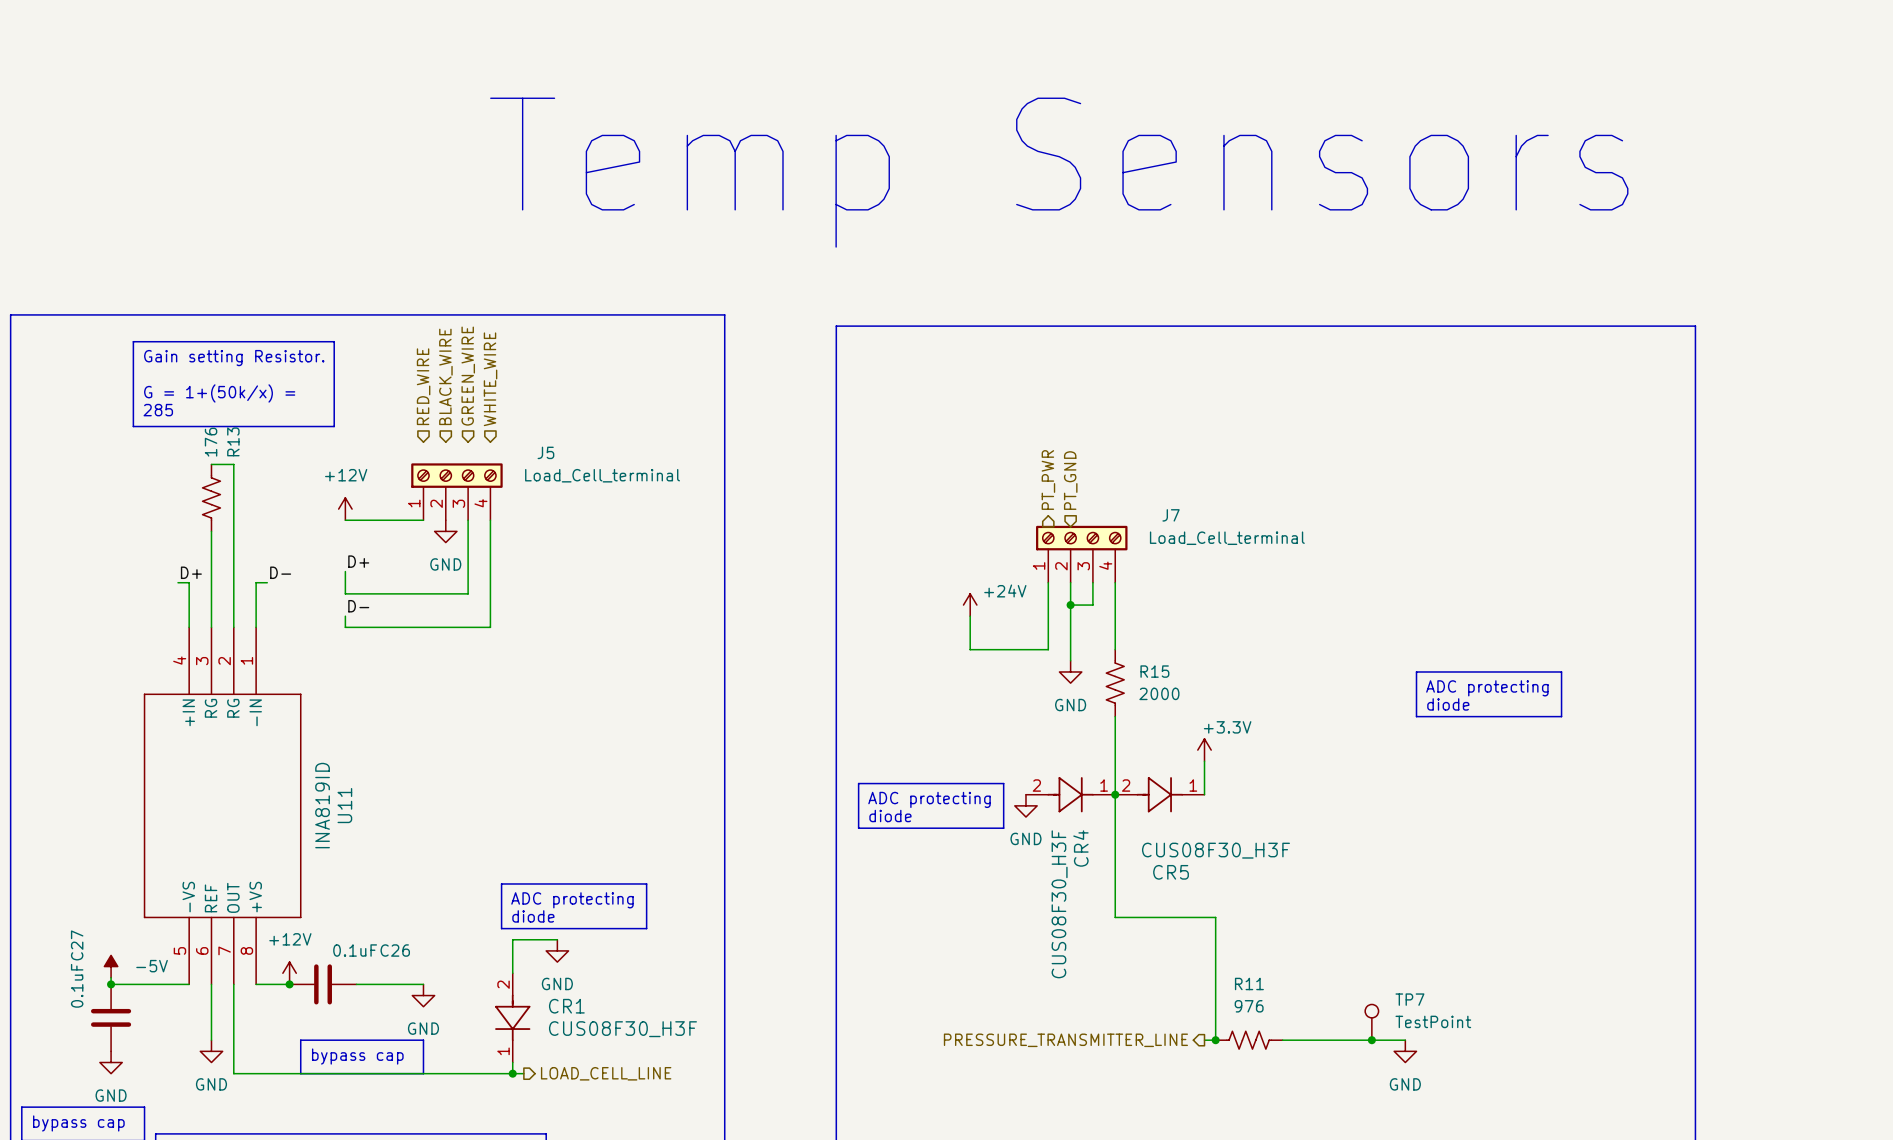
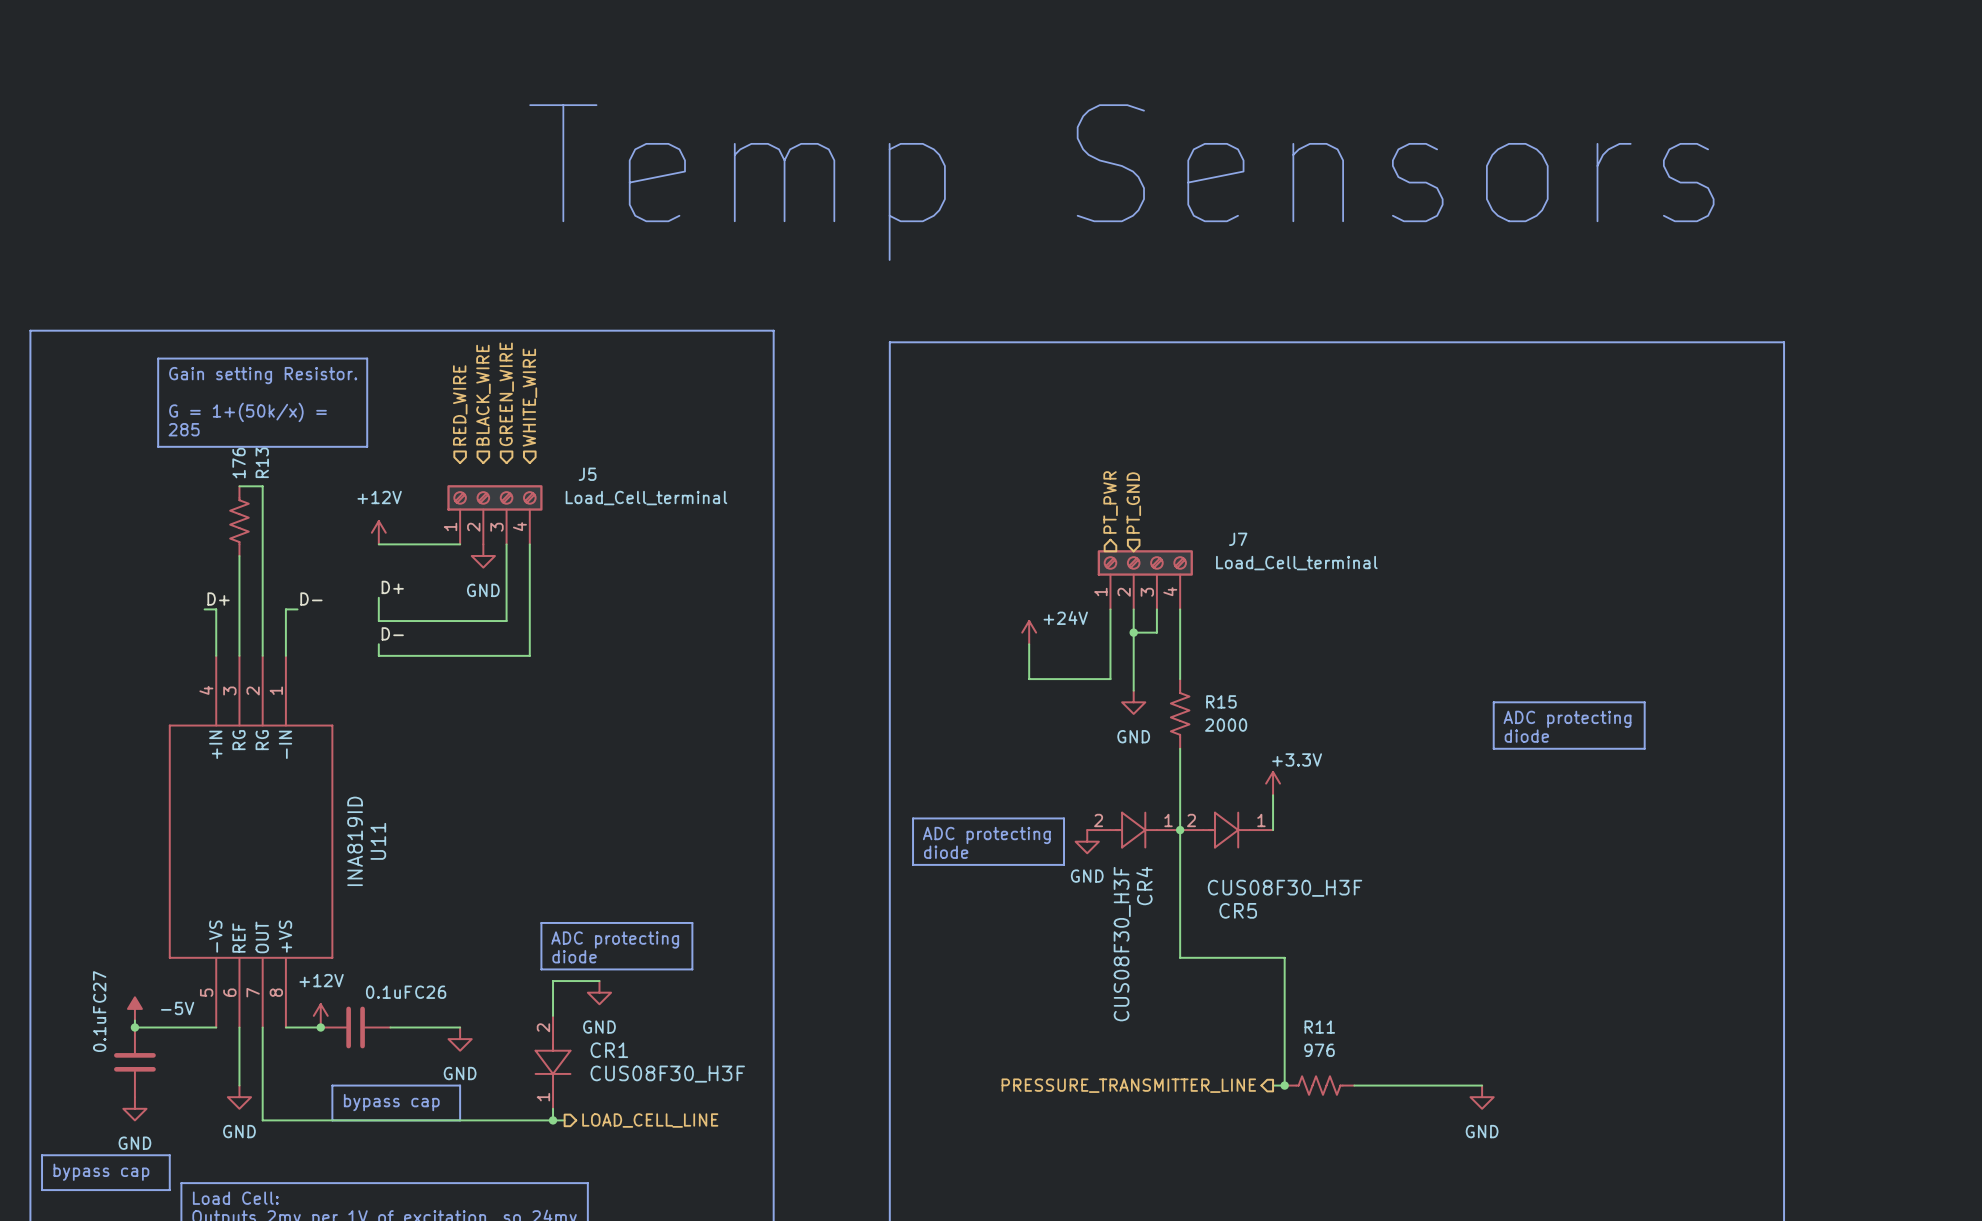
TP7: TestPoint (1371, 1022) -> none
junction: (1371, 1040) -> none

